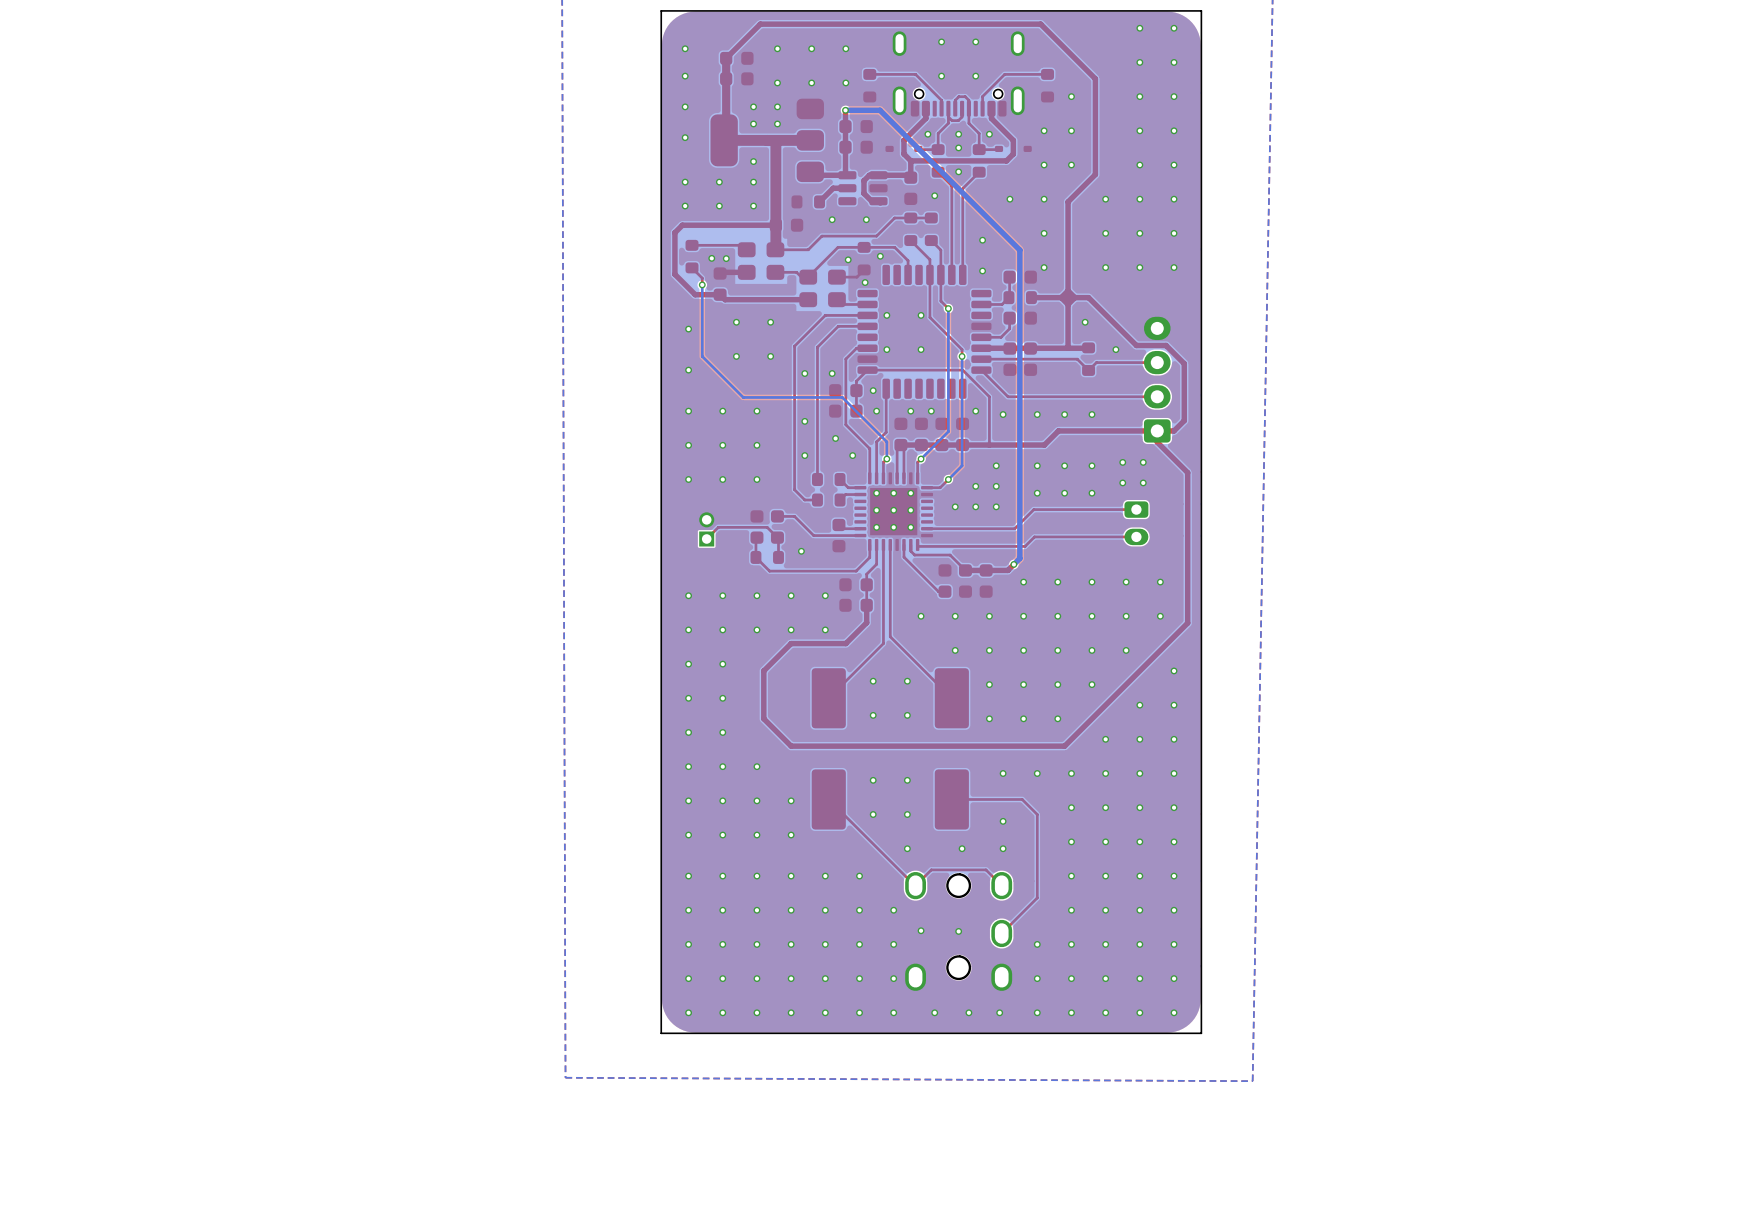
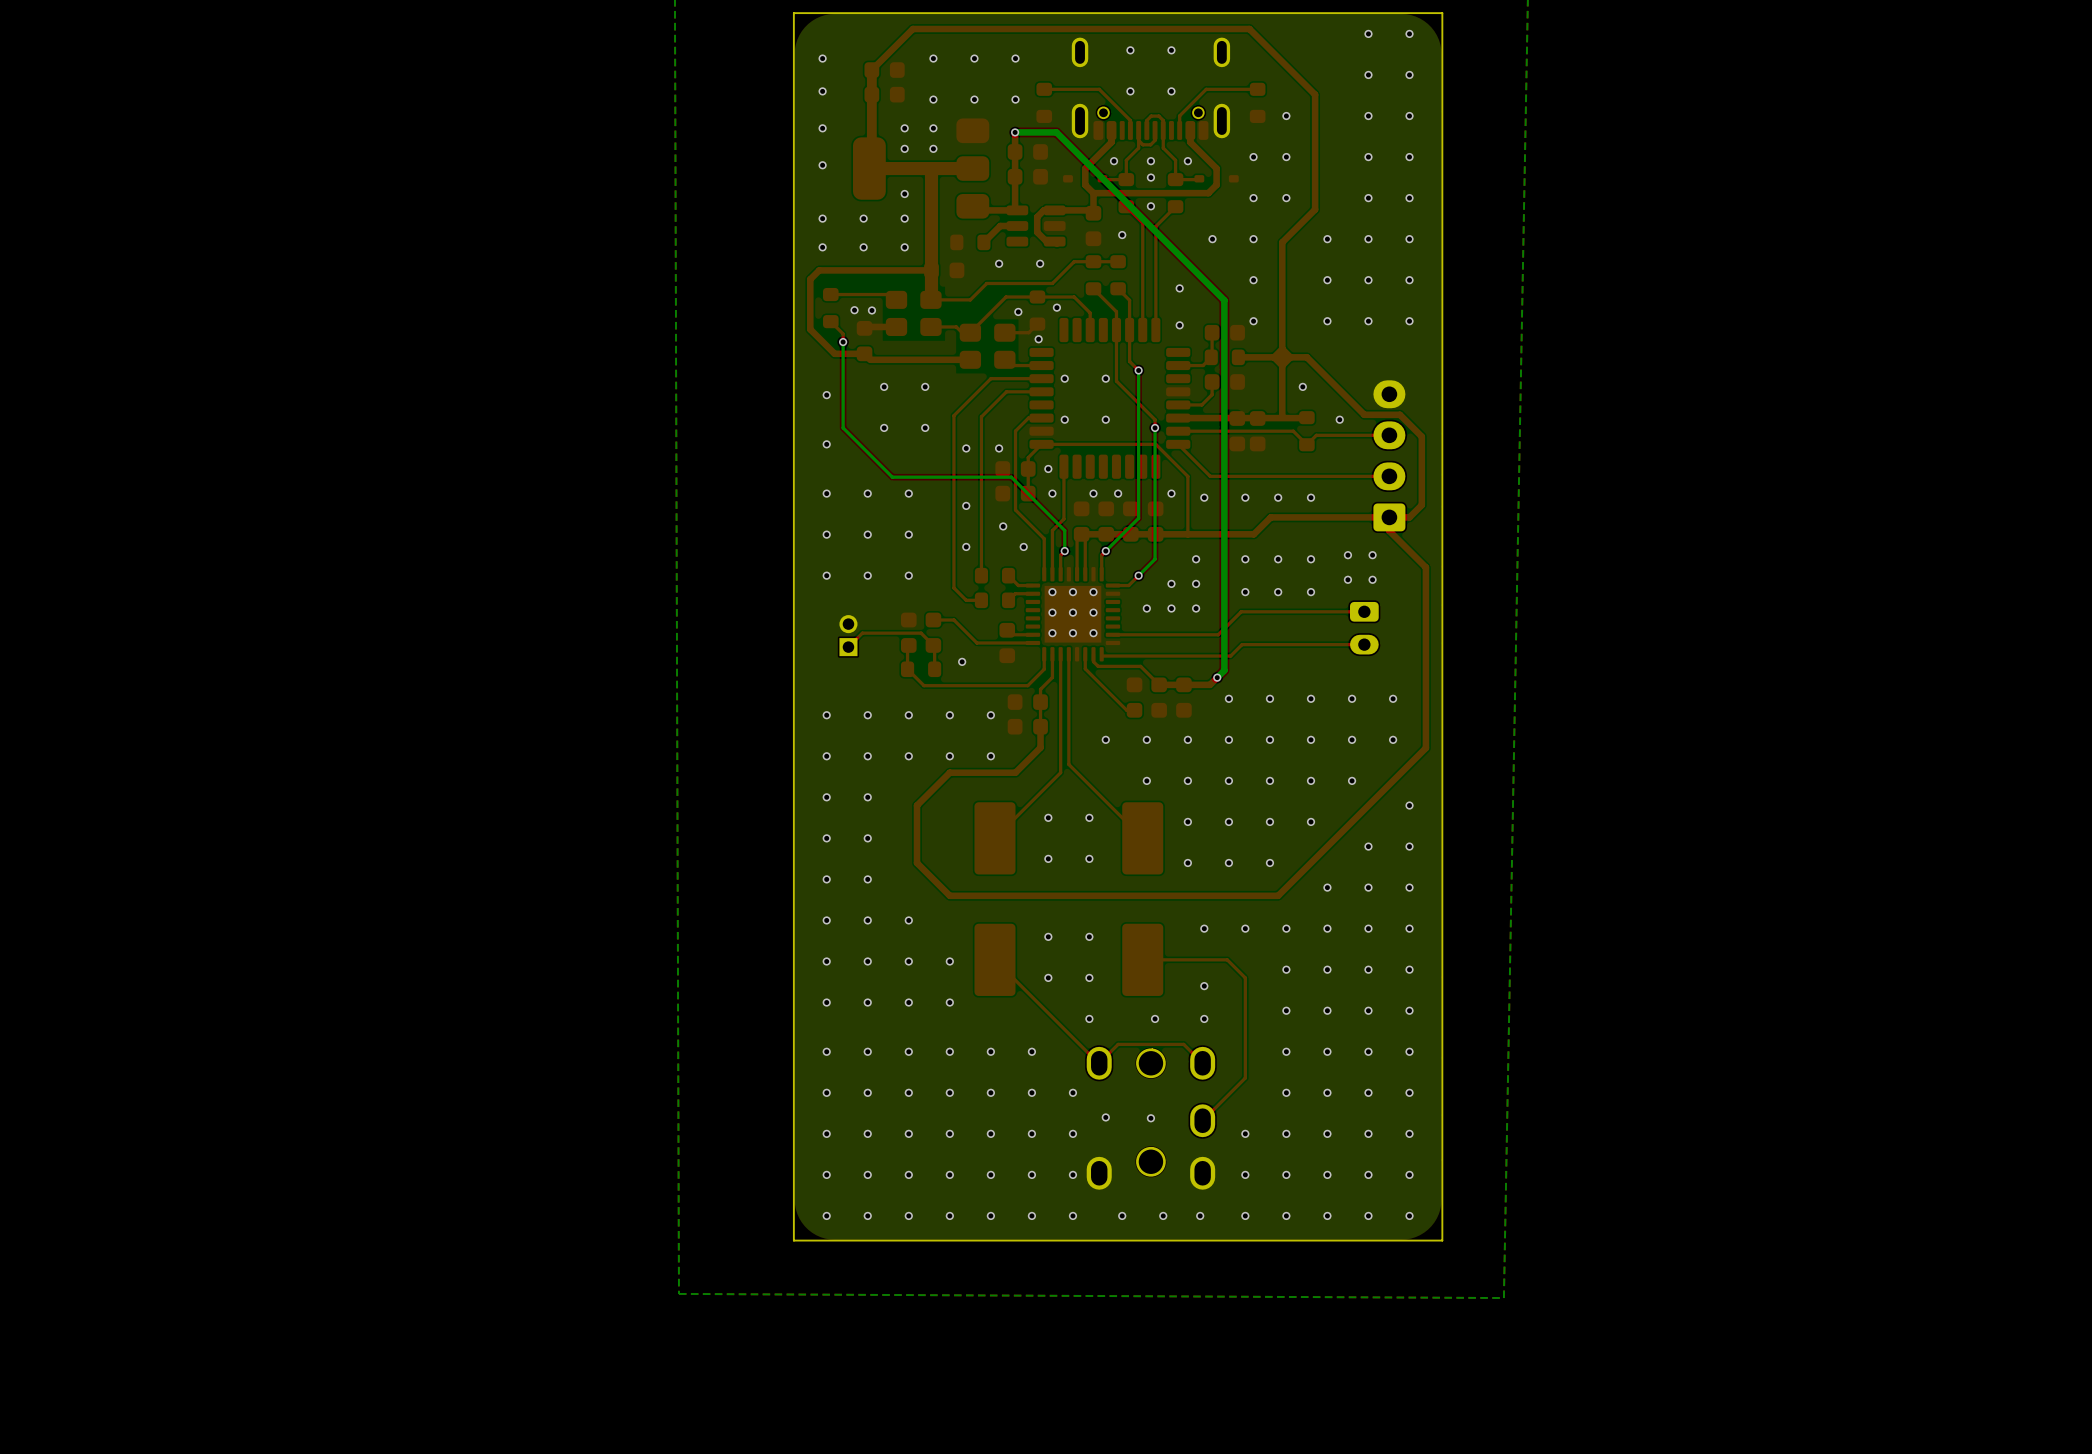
part position: (1009, 359) -> (1257, 431)

